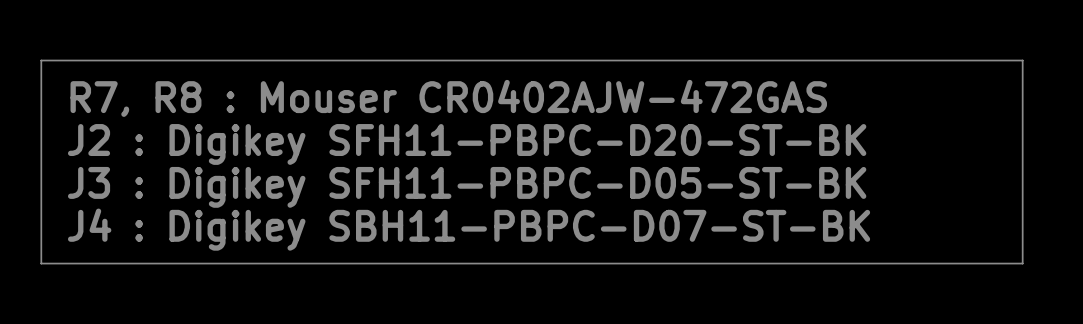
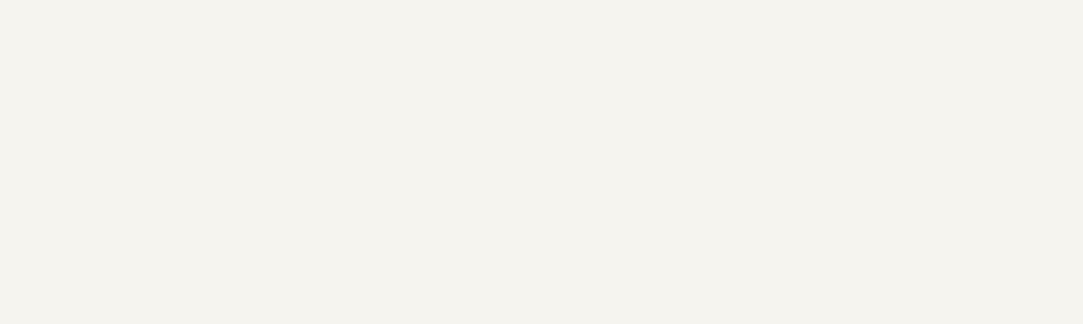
line: (41, 60) (1022, 60) (1022, 263) (41, 263) (41, 60) -> none
text: R7, R8 : Mouser CR0402AJW-472GAS (448, 98) -> none
text: J2 : Digikey SFH11-PBPC-D20-ST-BK (467, 144) -> none
text: J3 : Digikey SFH11-PBPC-D05-ST-BK (467, 187) -> none
text: J4 : Digikey SBH11-PBPC-D07-ST-BK (469, 229) -> none

